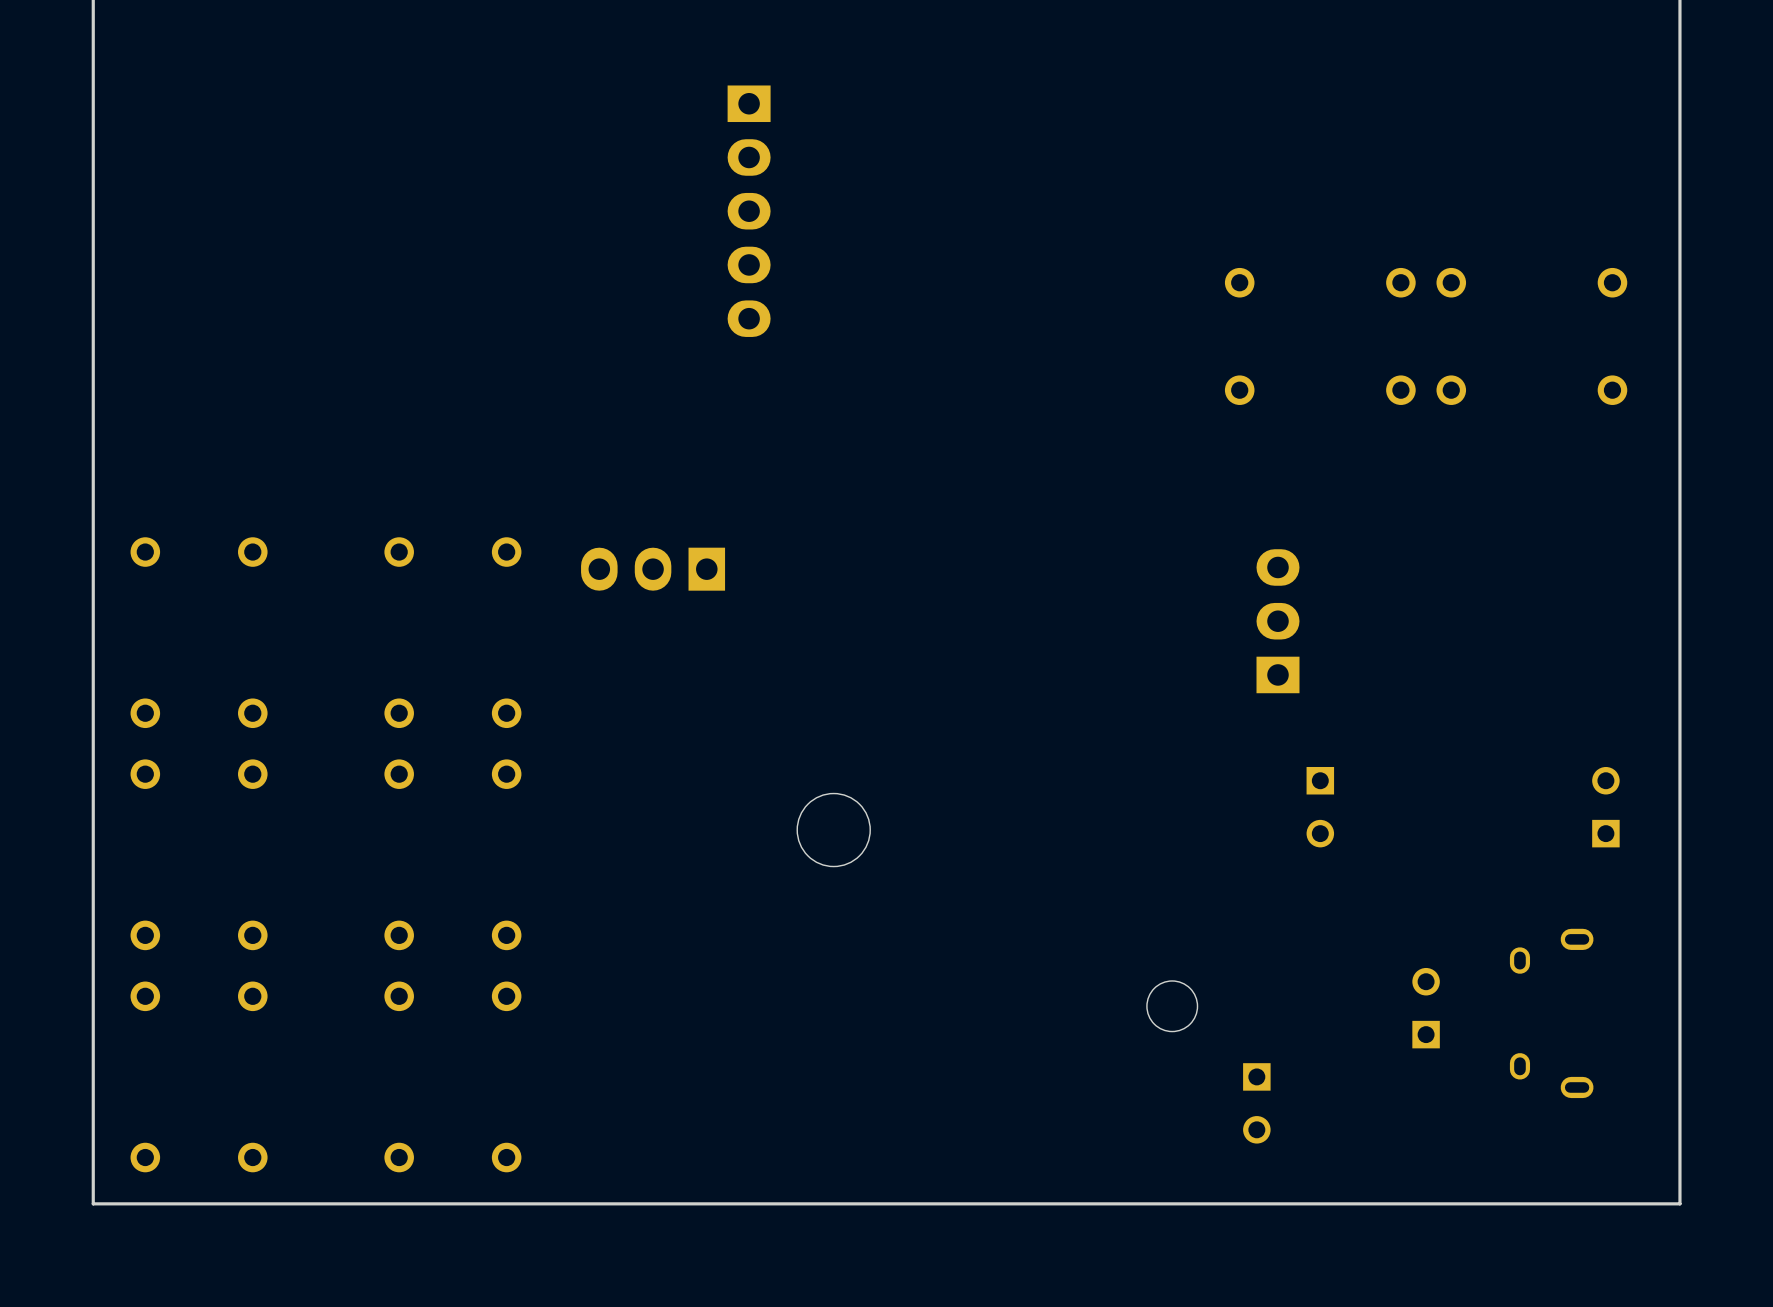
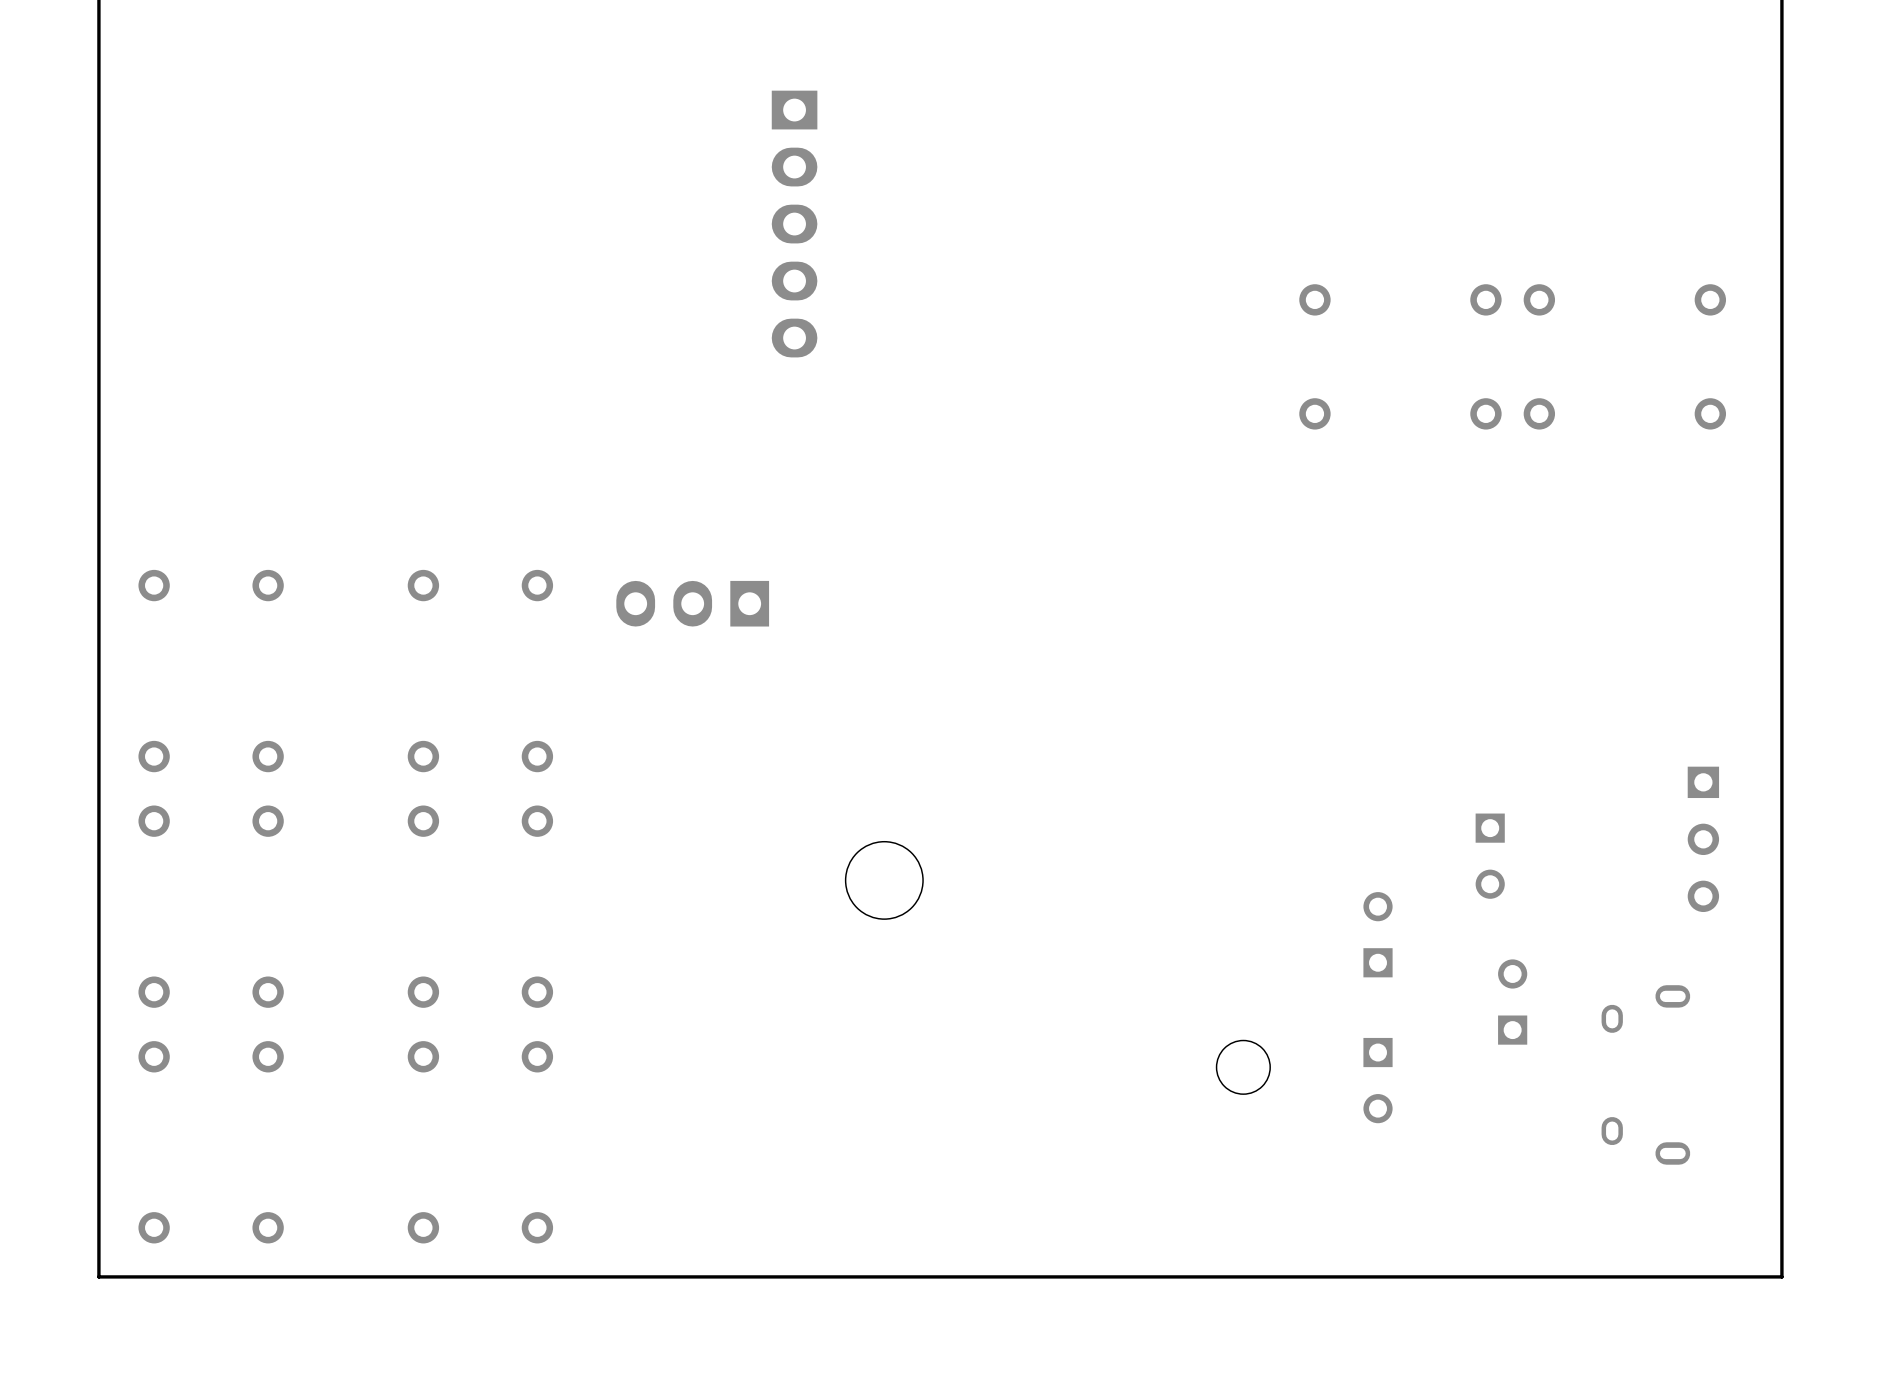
part: (1278, 621) -> none
part footprint: [1592, 766, 1620, 848] -> [1687, 766, 1720, 913]
part: (1320, 807) -> none
part: none -> (1490, 856)
part: none -> (1378, 934)
part position: (1426, 1008) -> (1512, 1002)
part: none -> (1378, 1080)
part: (1256, 1103) -> none

